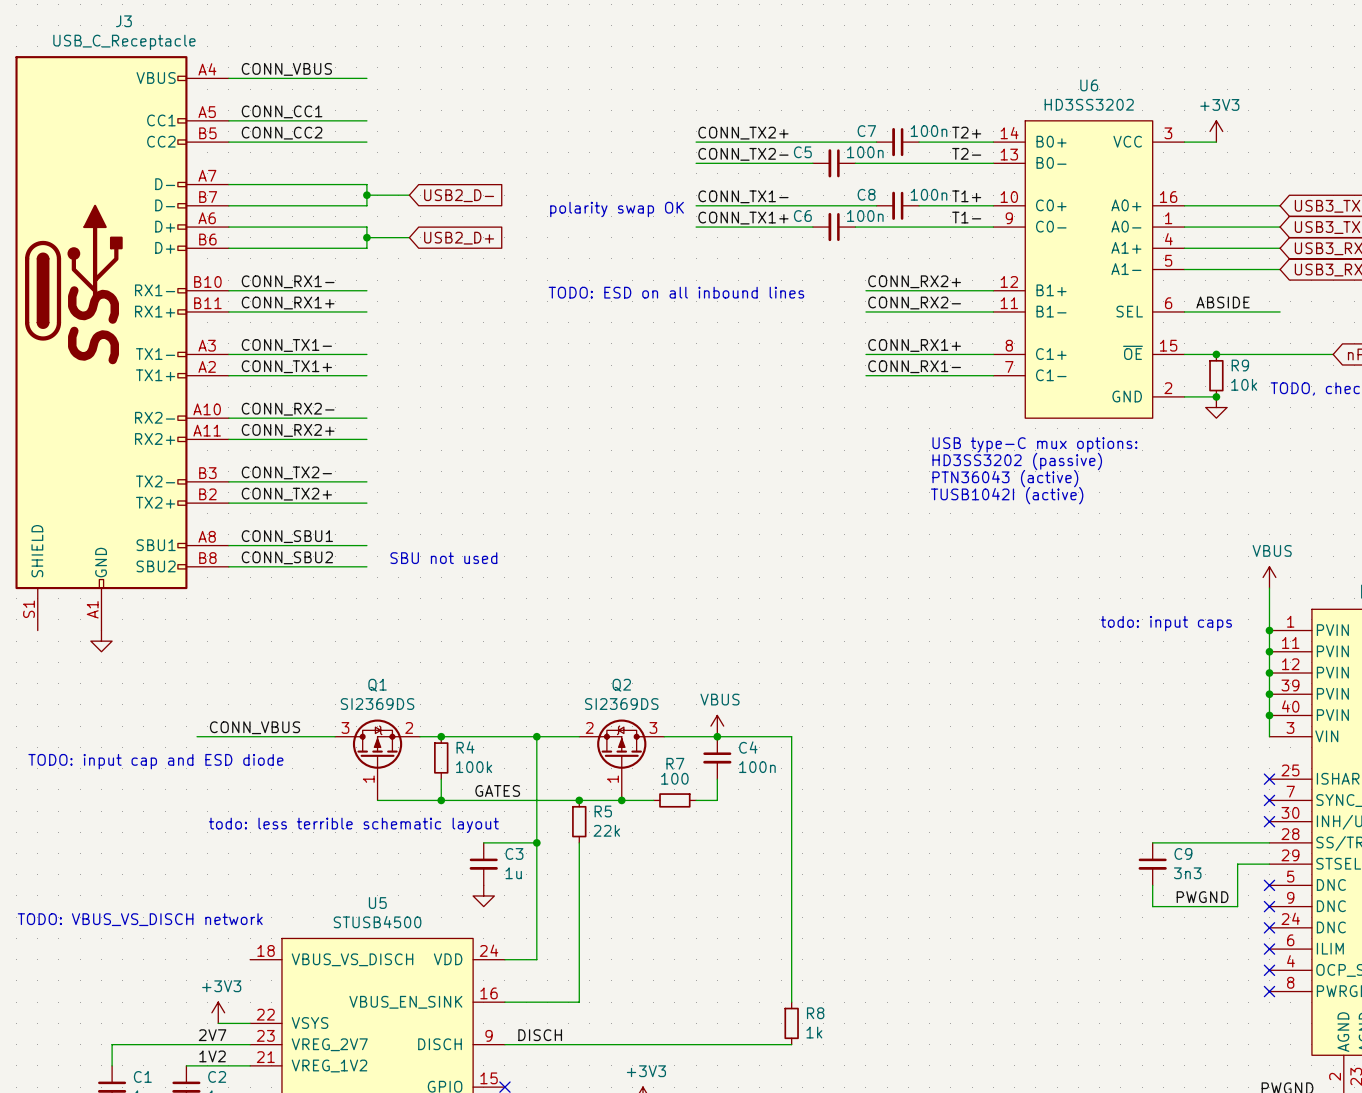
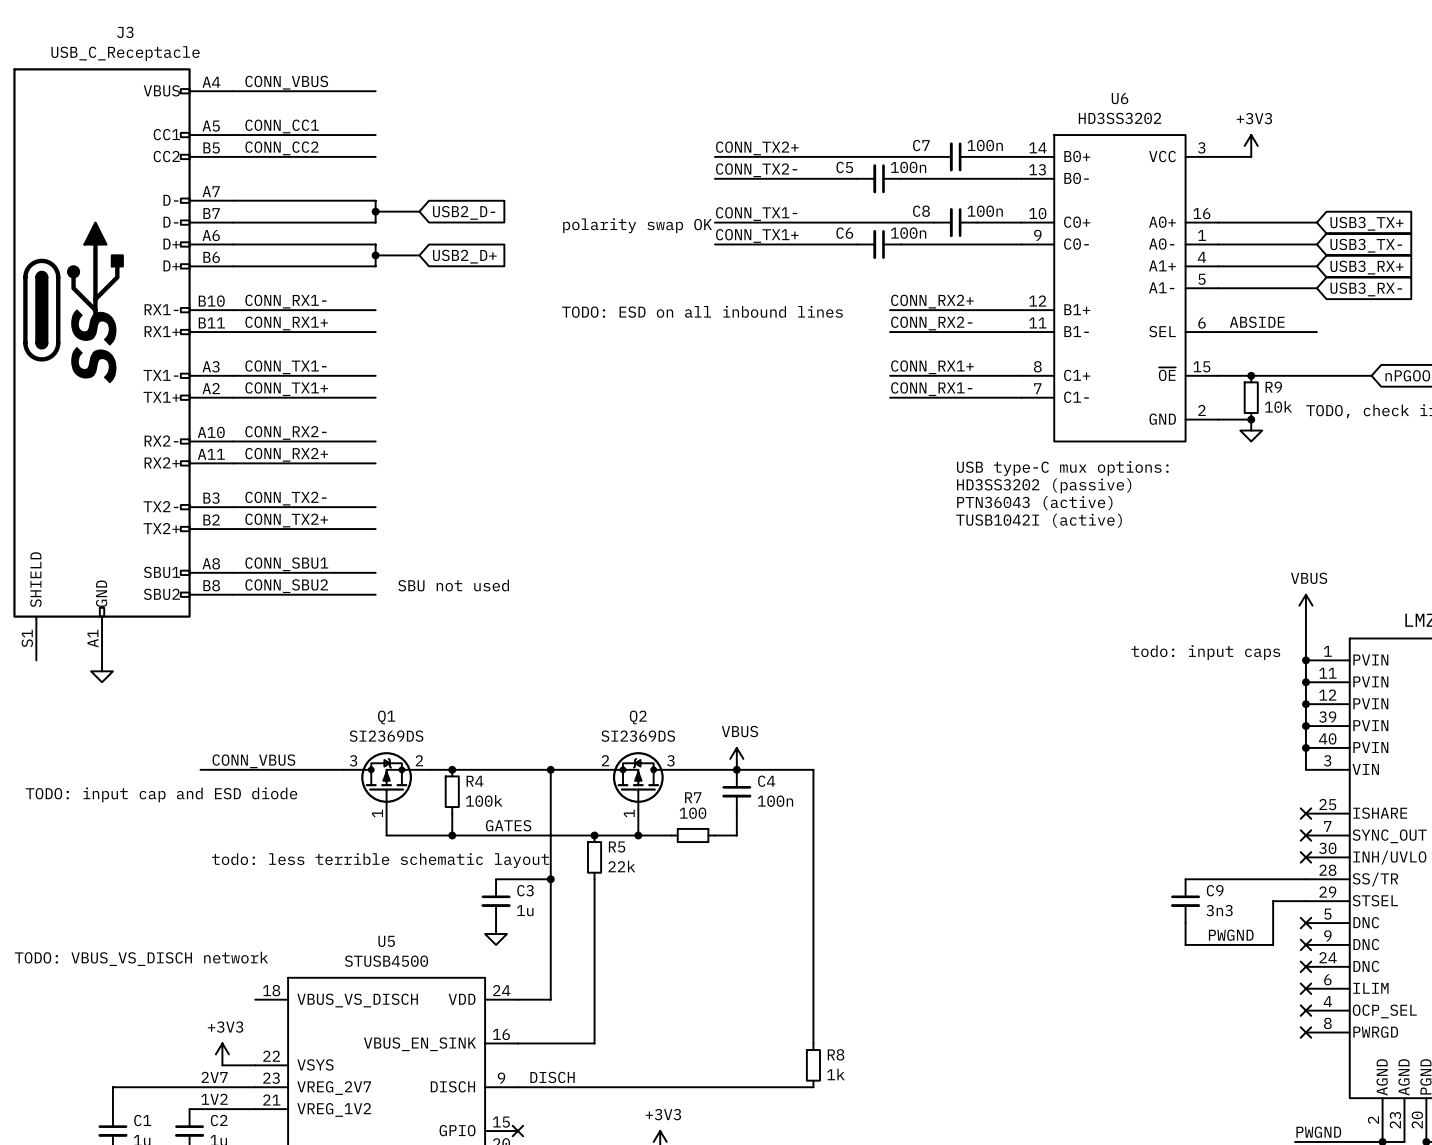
label: T2+ (966, 132) -> none
C7 position: (897, 142) -> (955, 156)
label: T2- (966, 153) -> none
C5 position: (834, 163) -> (879, 178)
label: T1+ (966, 196) -> none
C8 position: (897, 205) -> (955, 222)
label: T1- (966, 217) -> none
C6 position: (834, 227) -> (879, 244)

